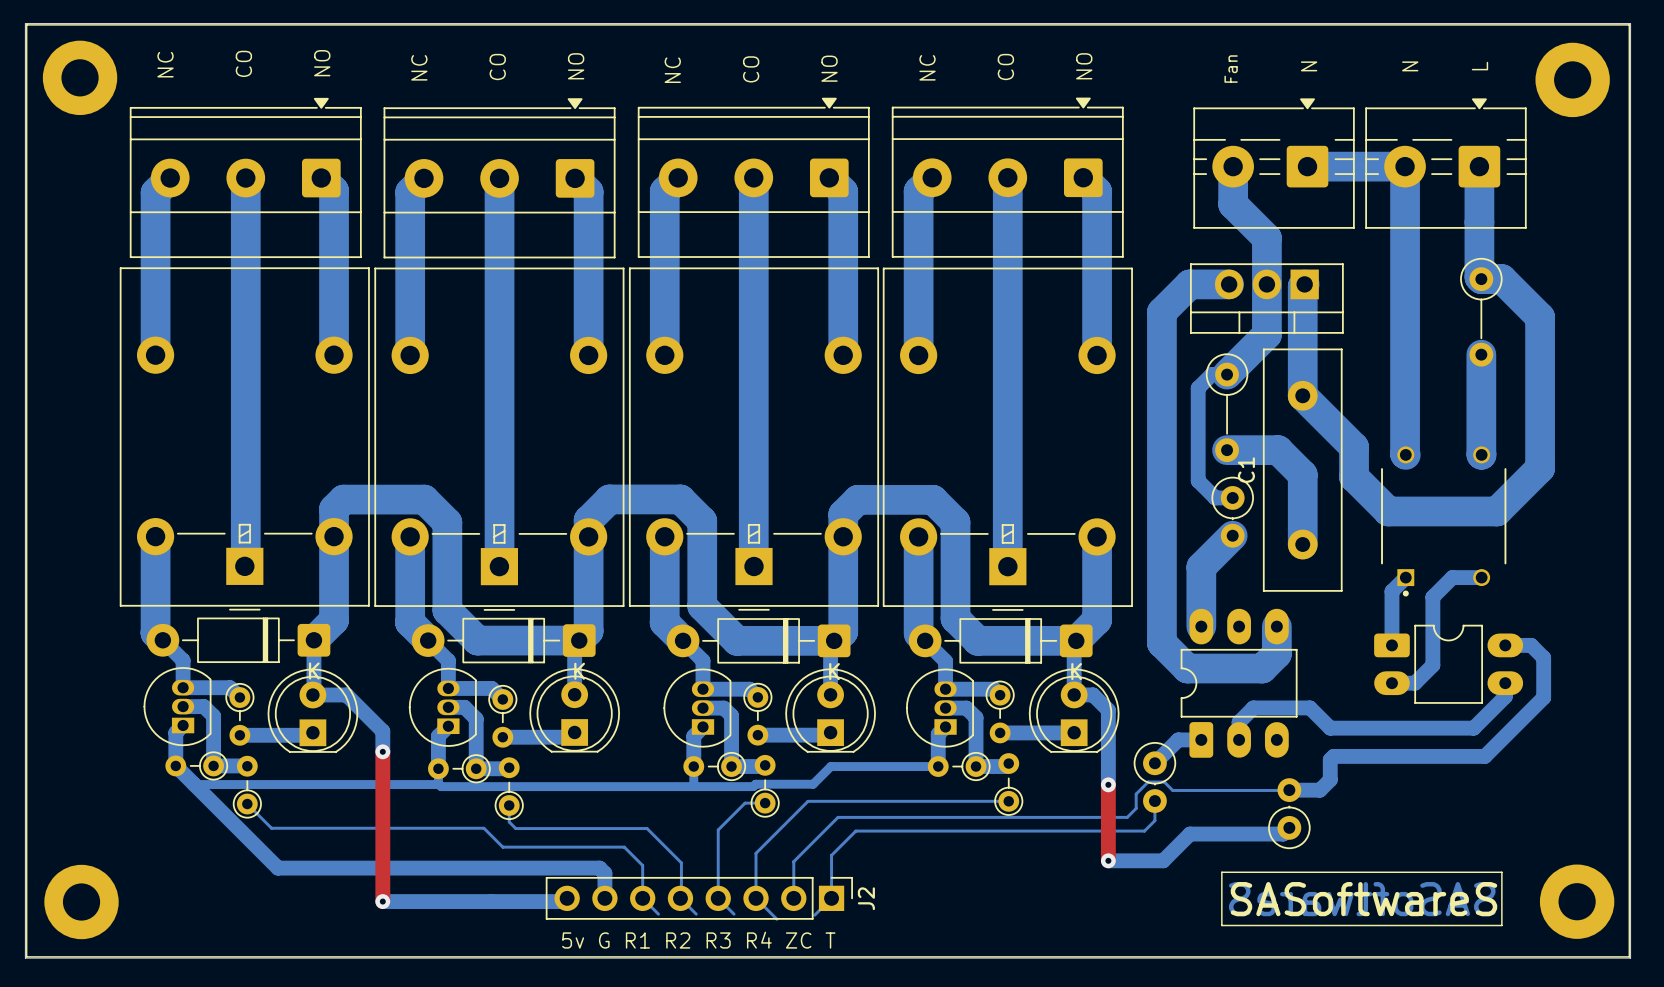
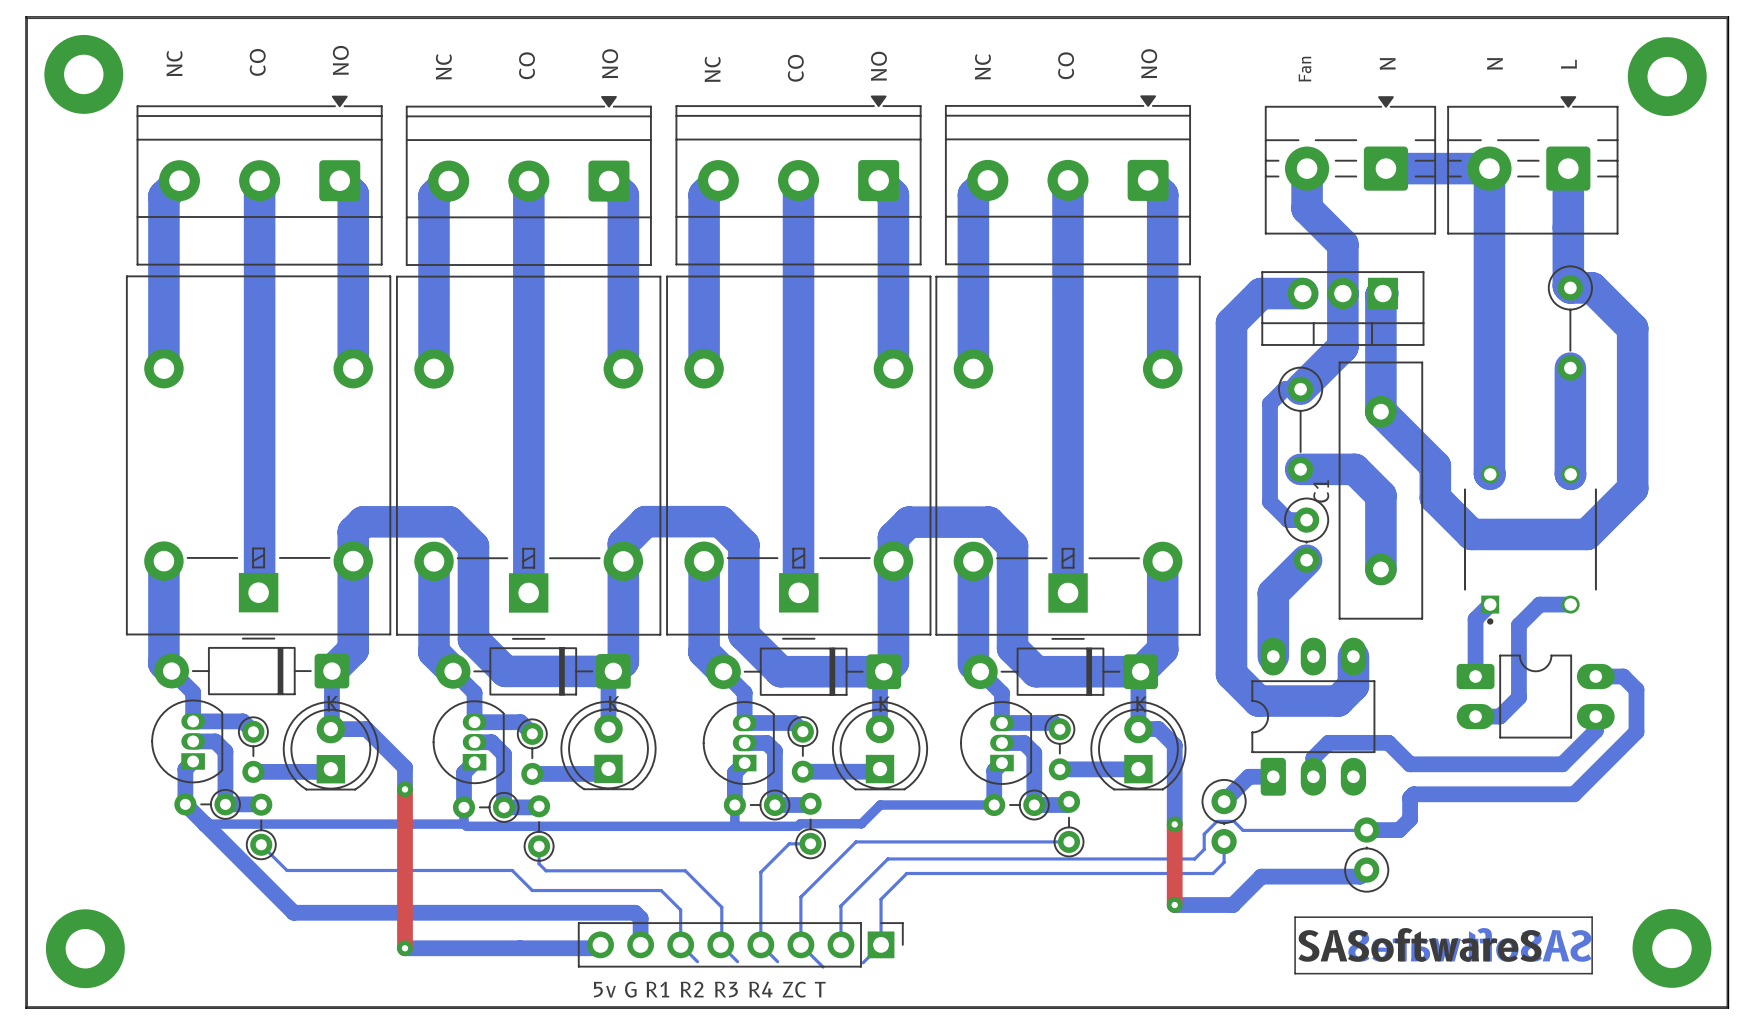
J2 name: J2 (866, 898) -> none

